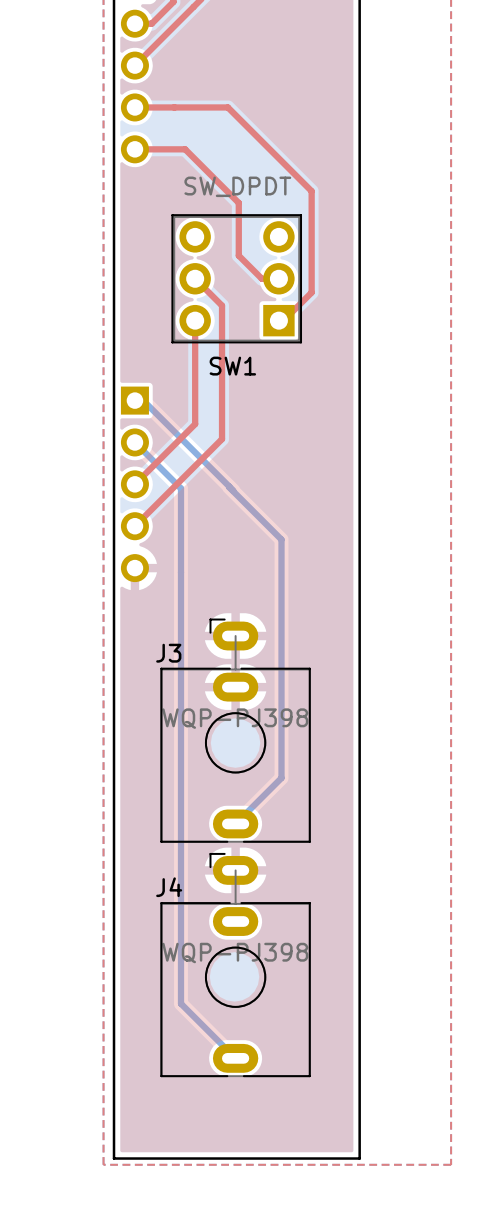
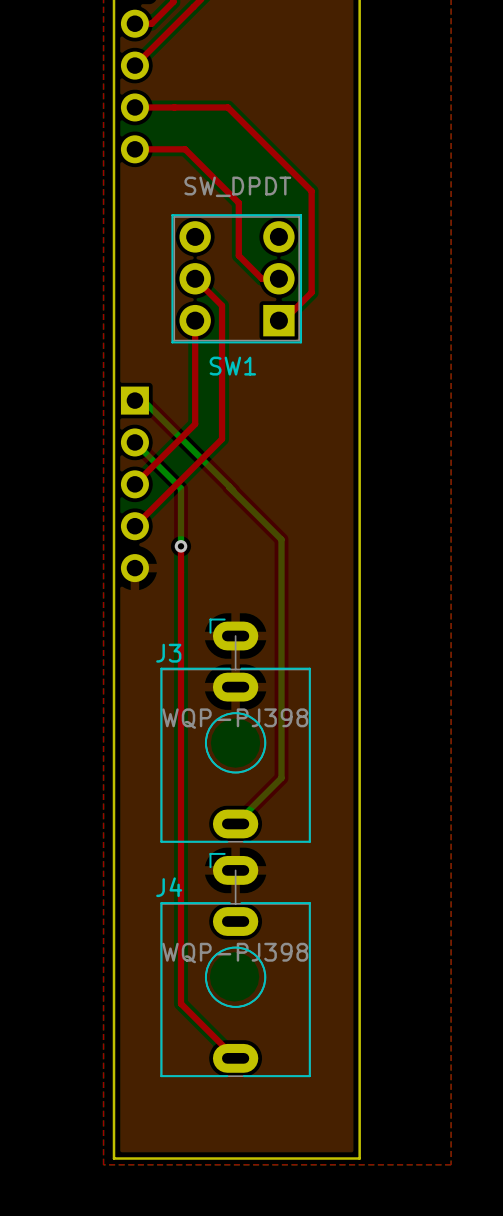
top track: none -> (181, 546) (181, 1003) (235, 1058)
bottom track: (181, 546) (181, 1003) (235, 1058) -> none
via: none -> (181, 546)

